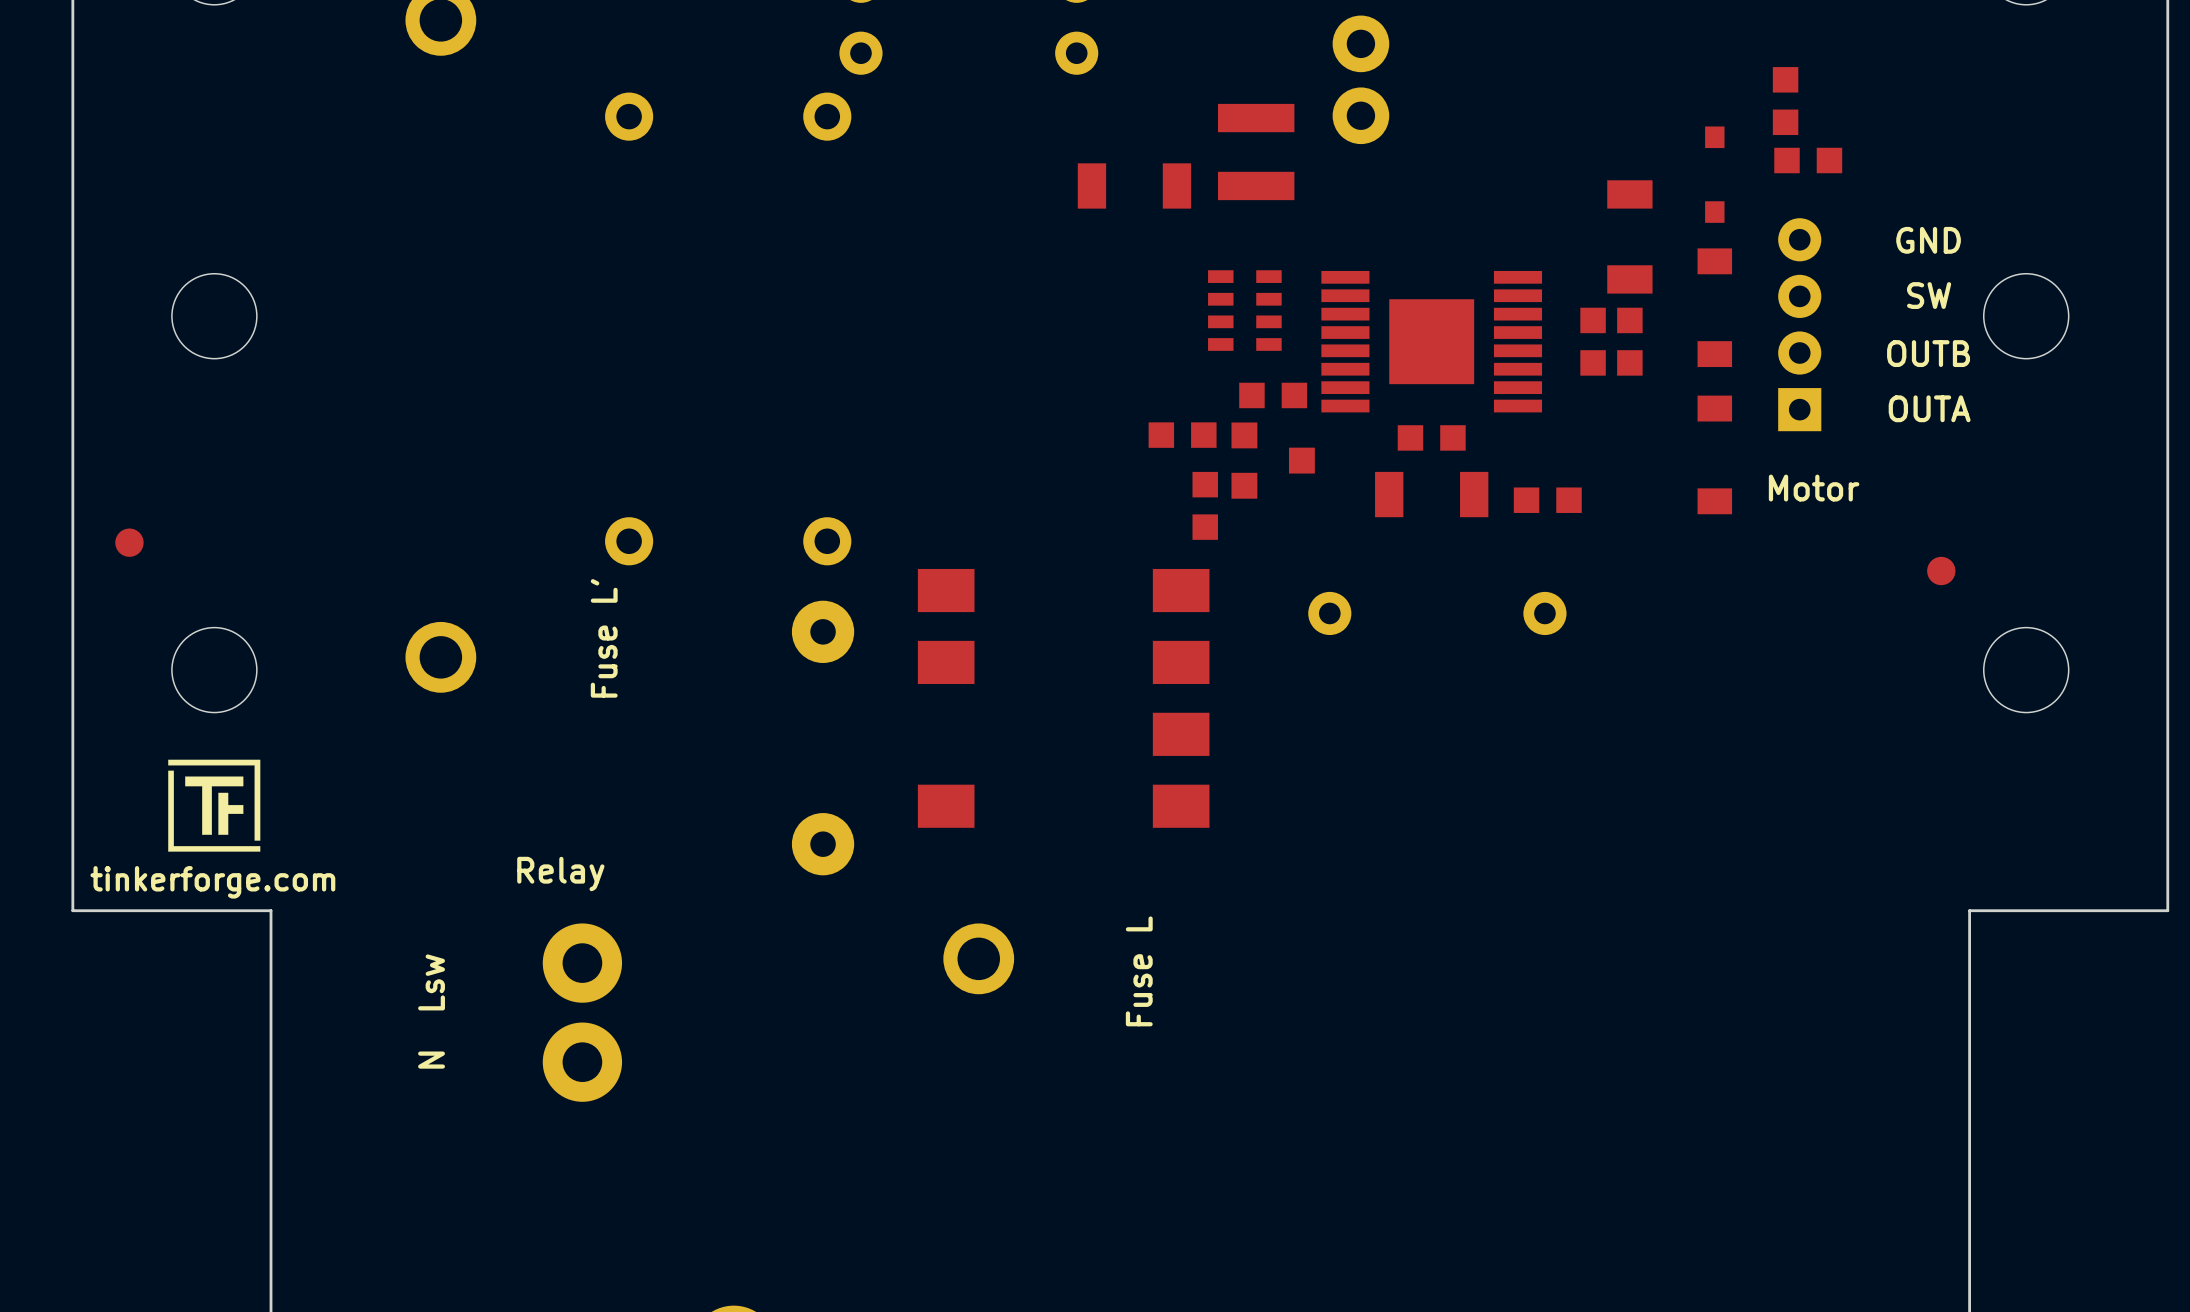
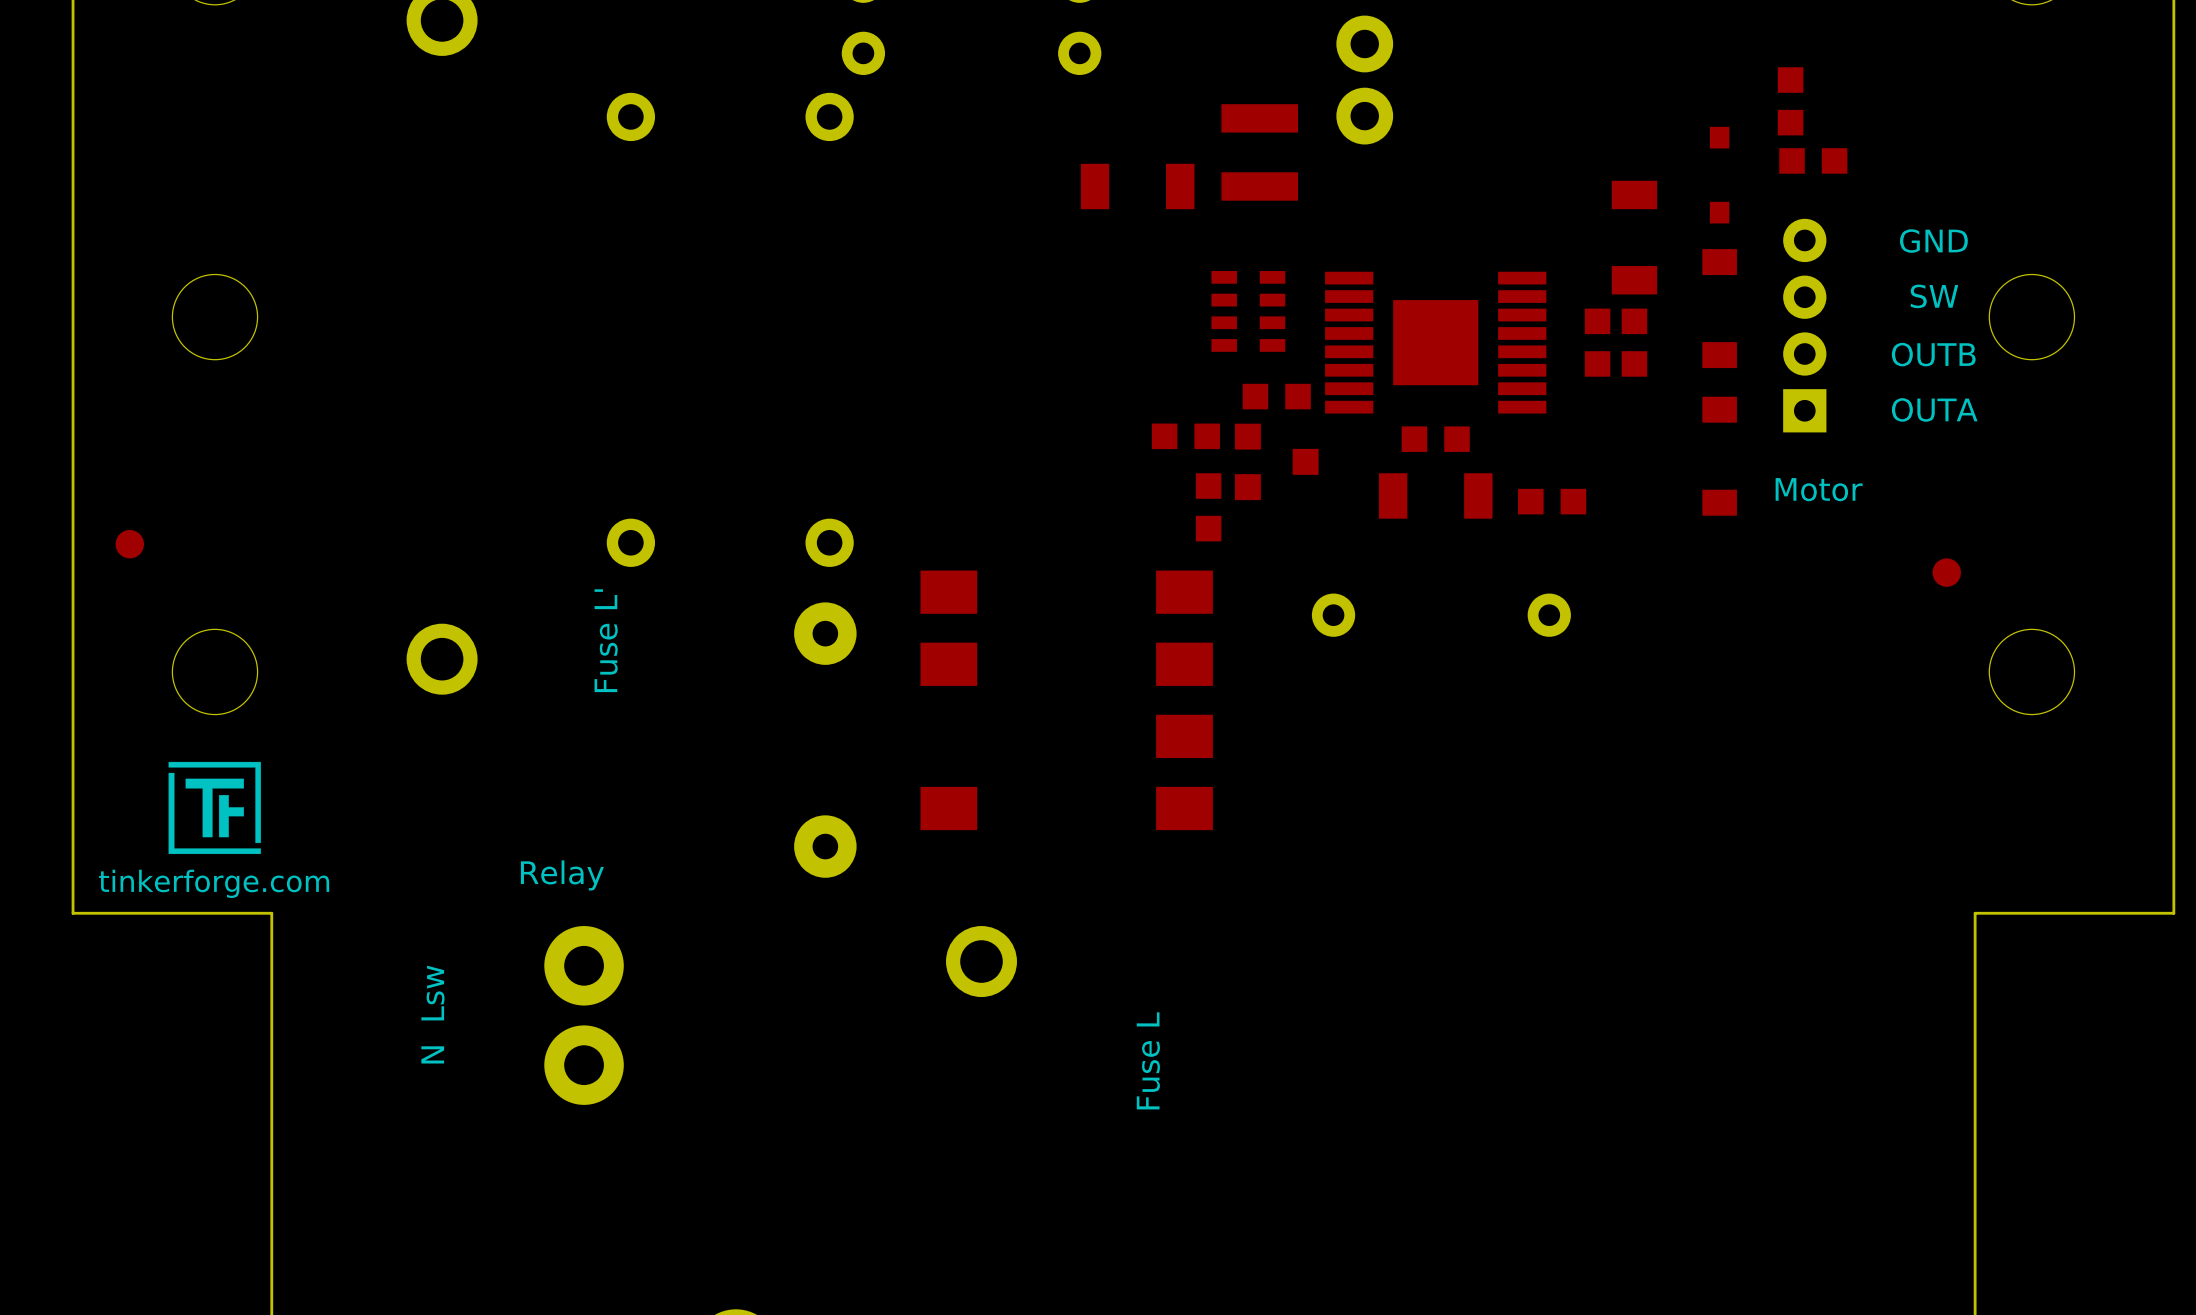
text position: Fuse L (1139, 971) -> Fuse L (1148, 1060)

